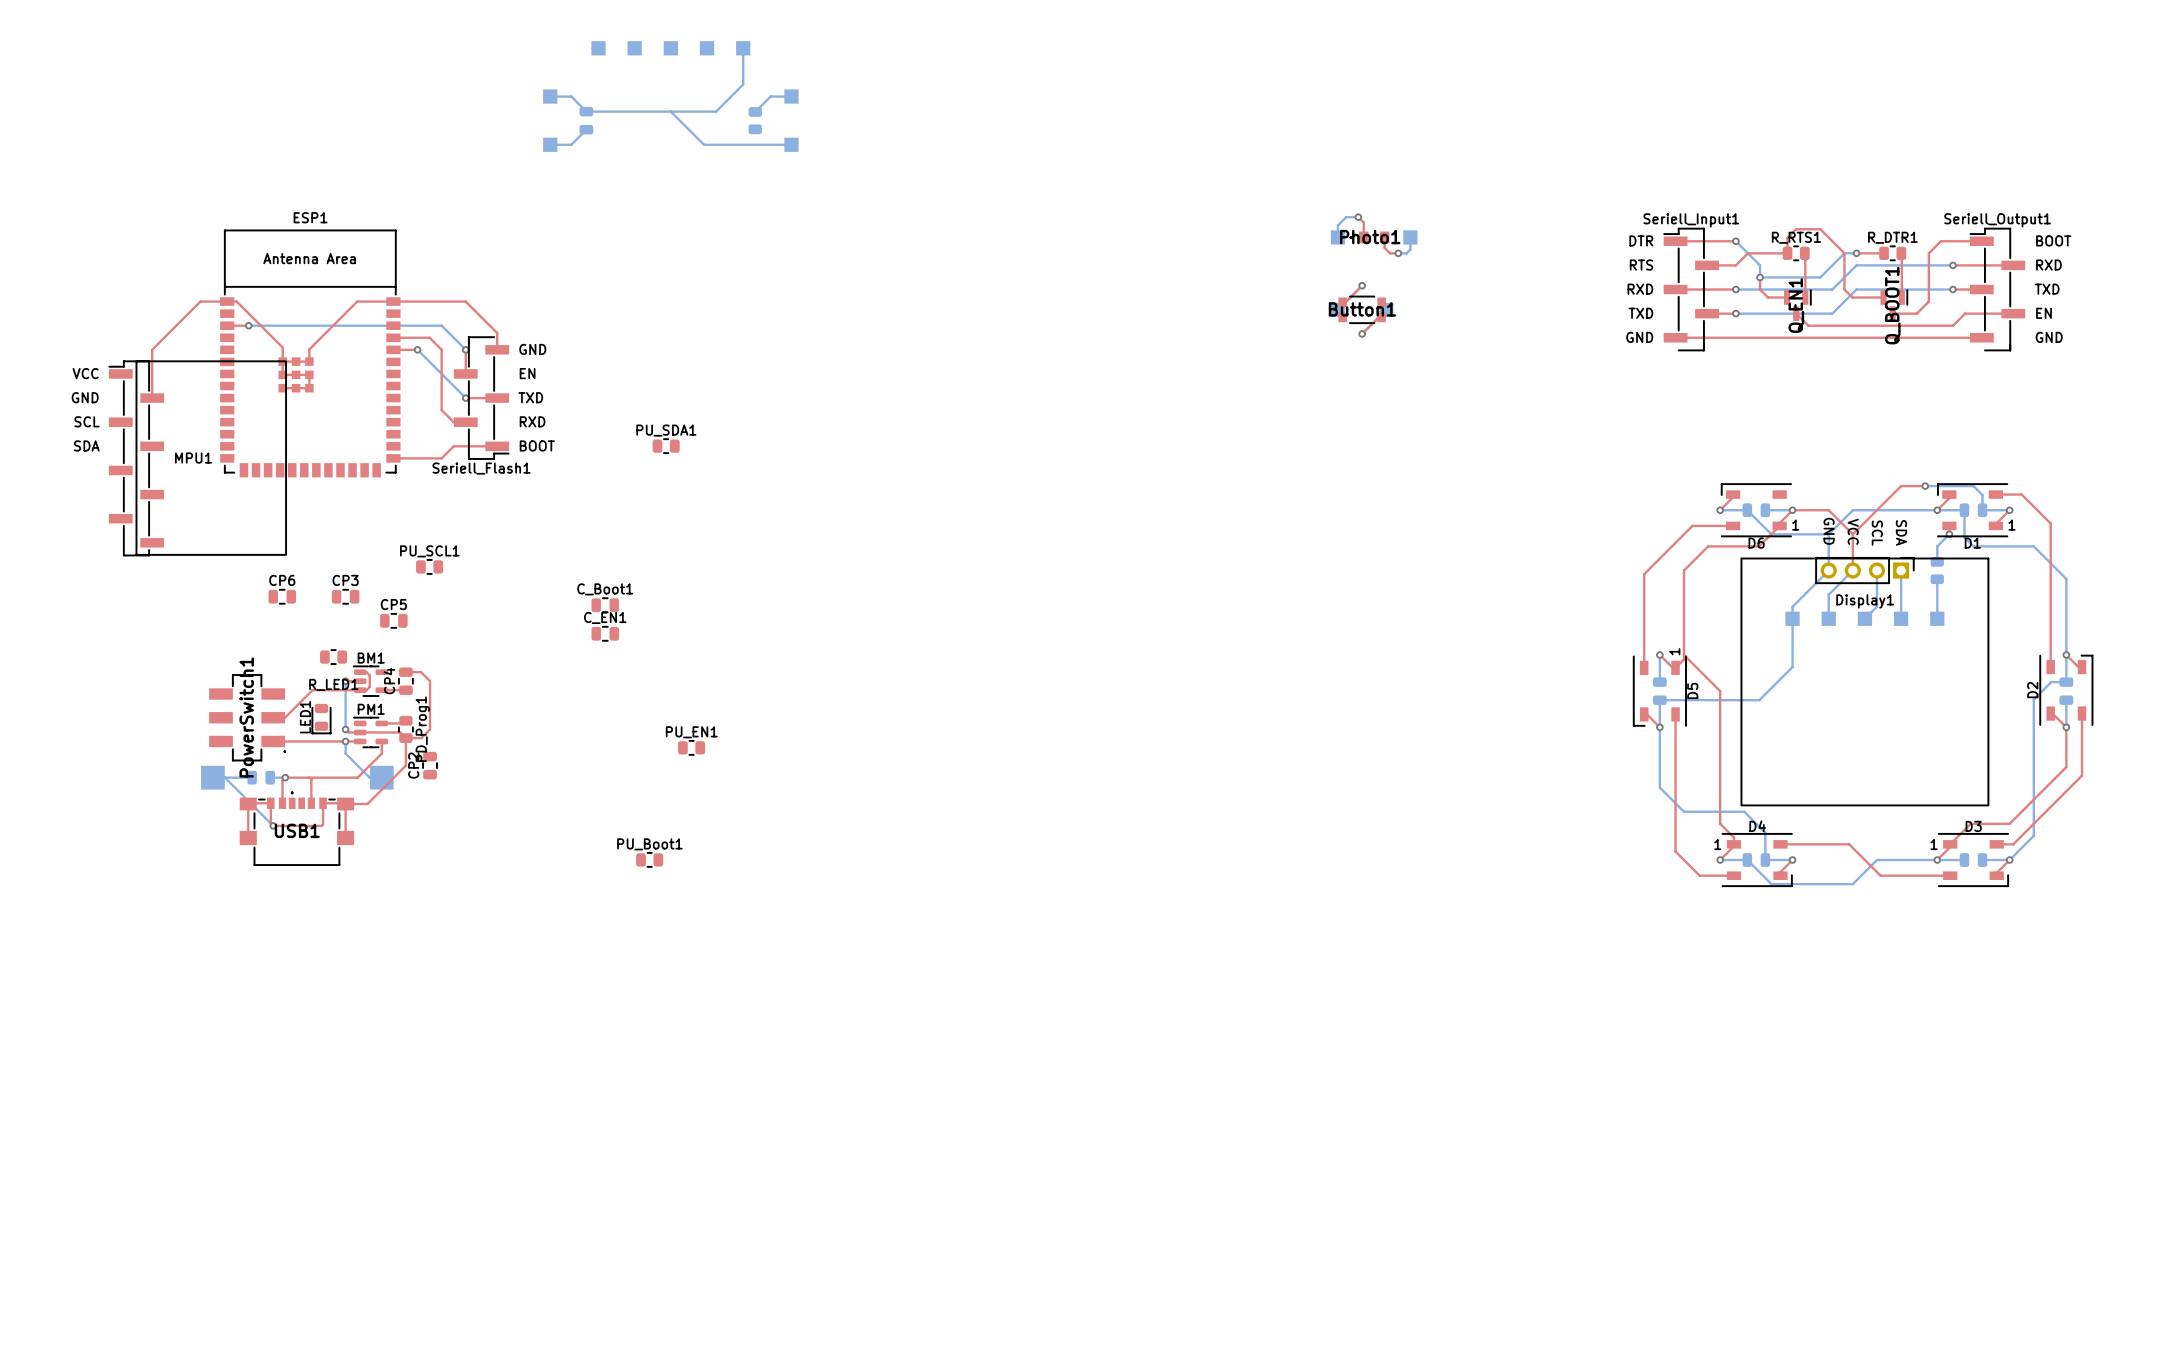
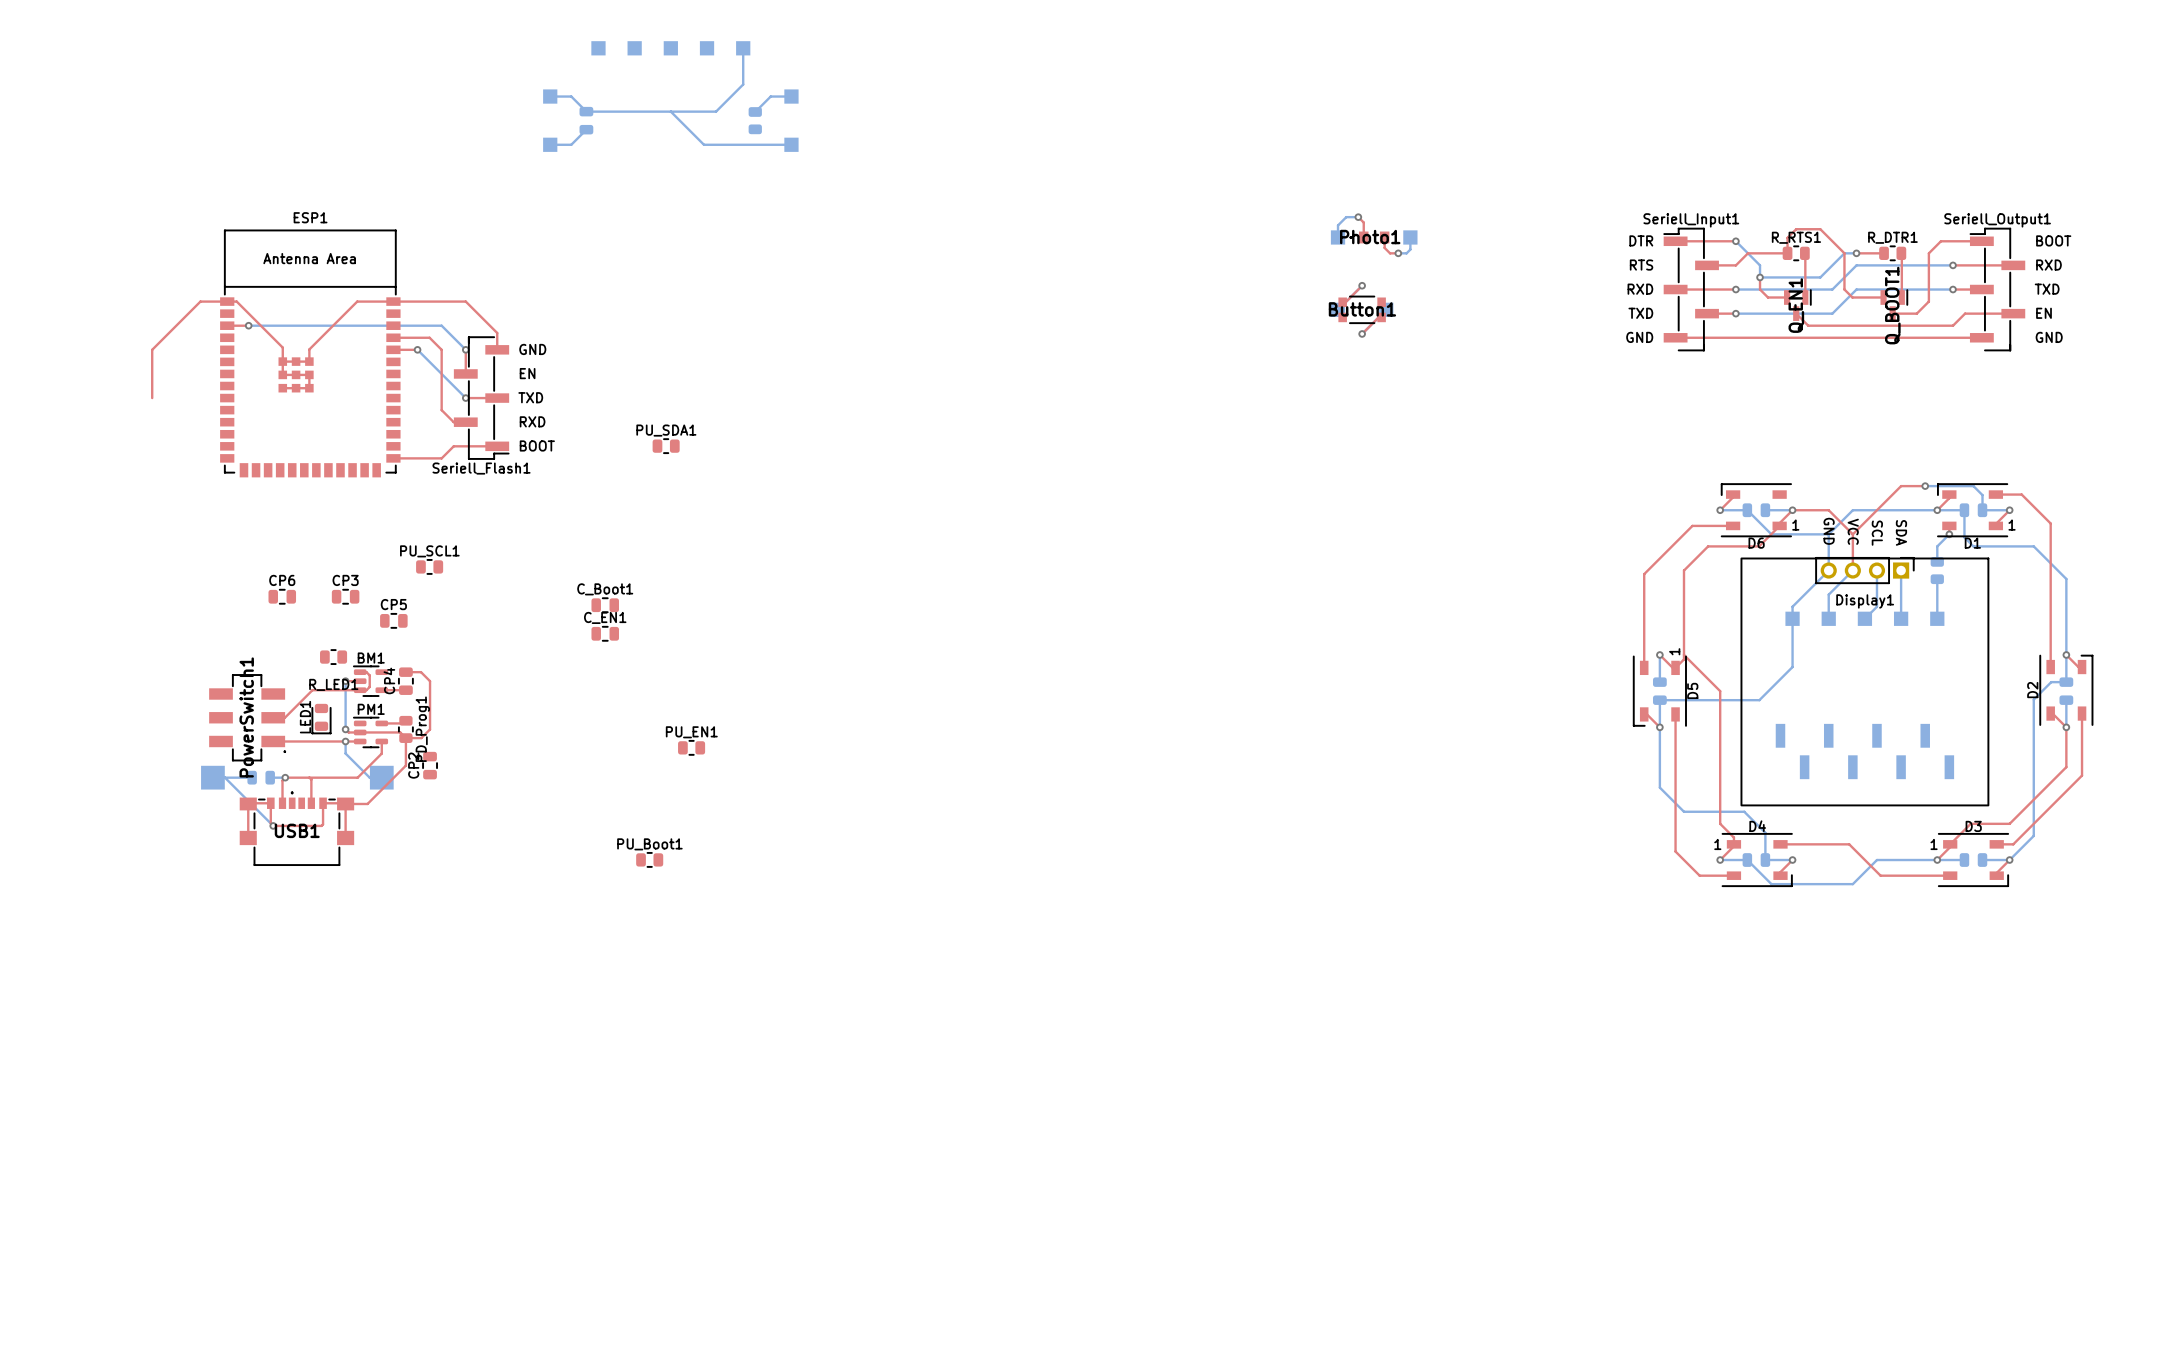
MPU1: (197, 458) -> none
part: none -> (1864, 751)

